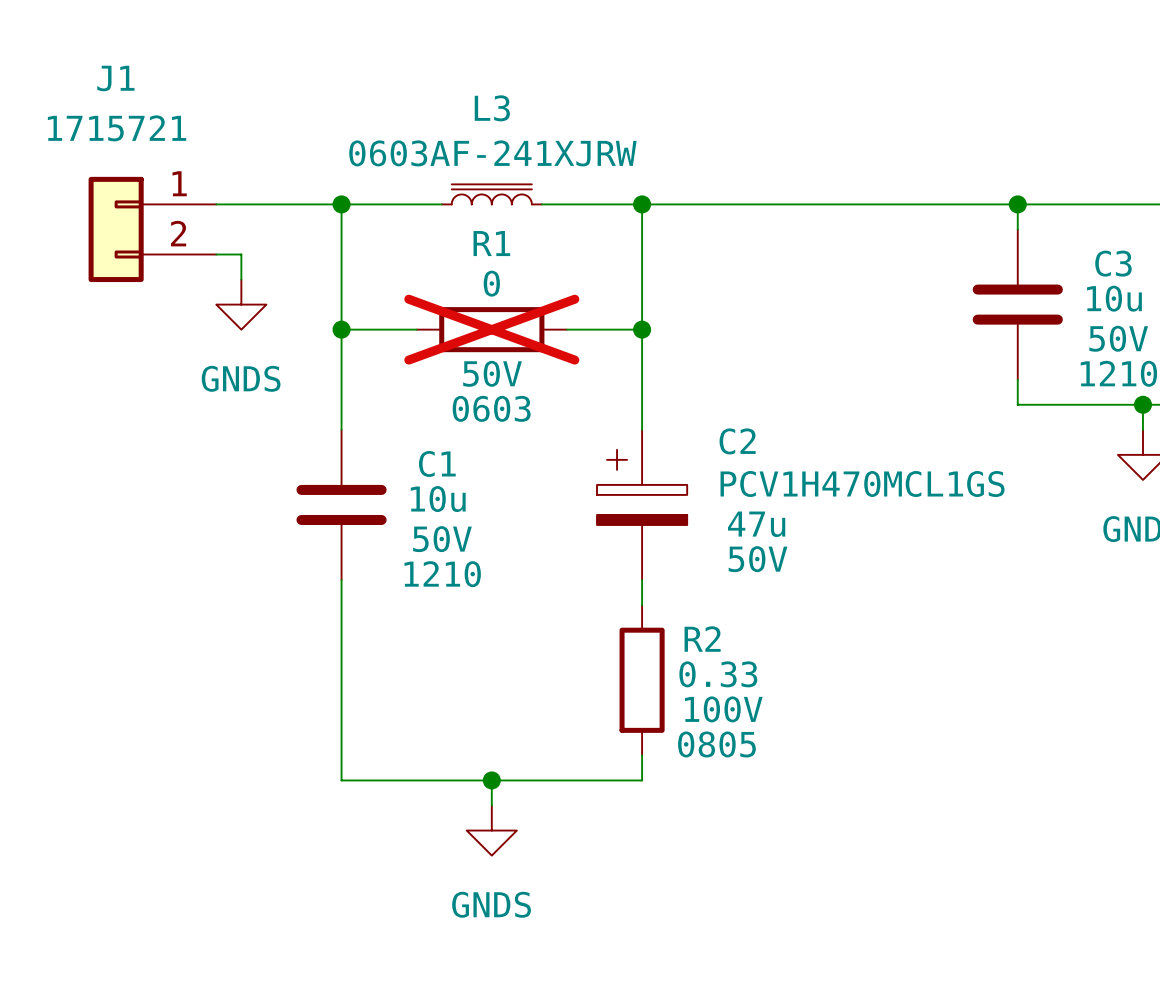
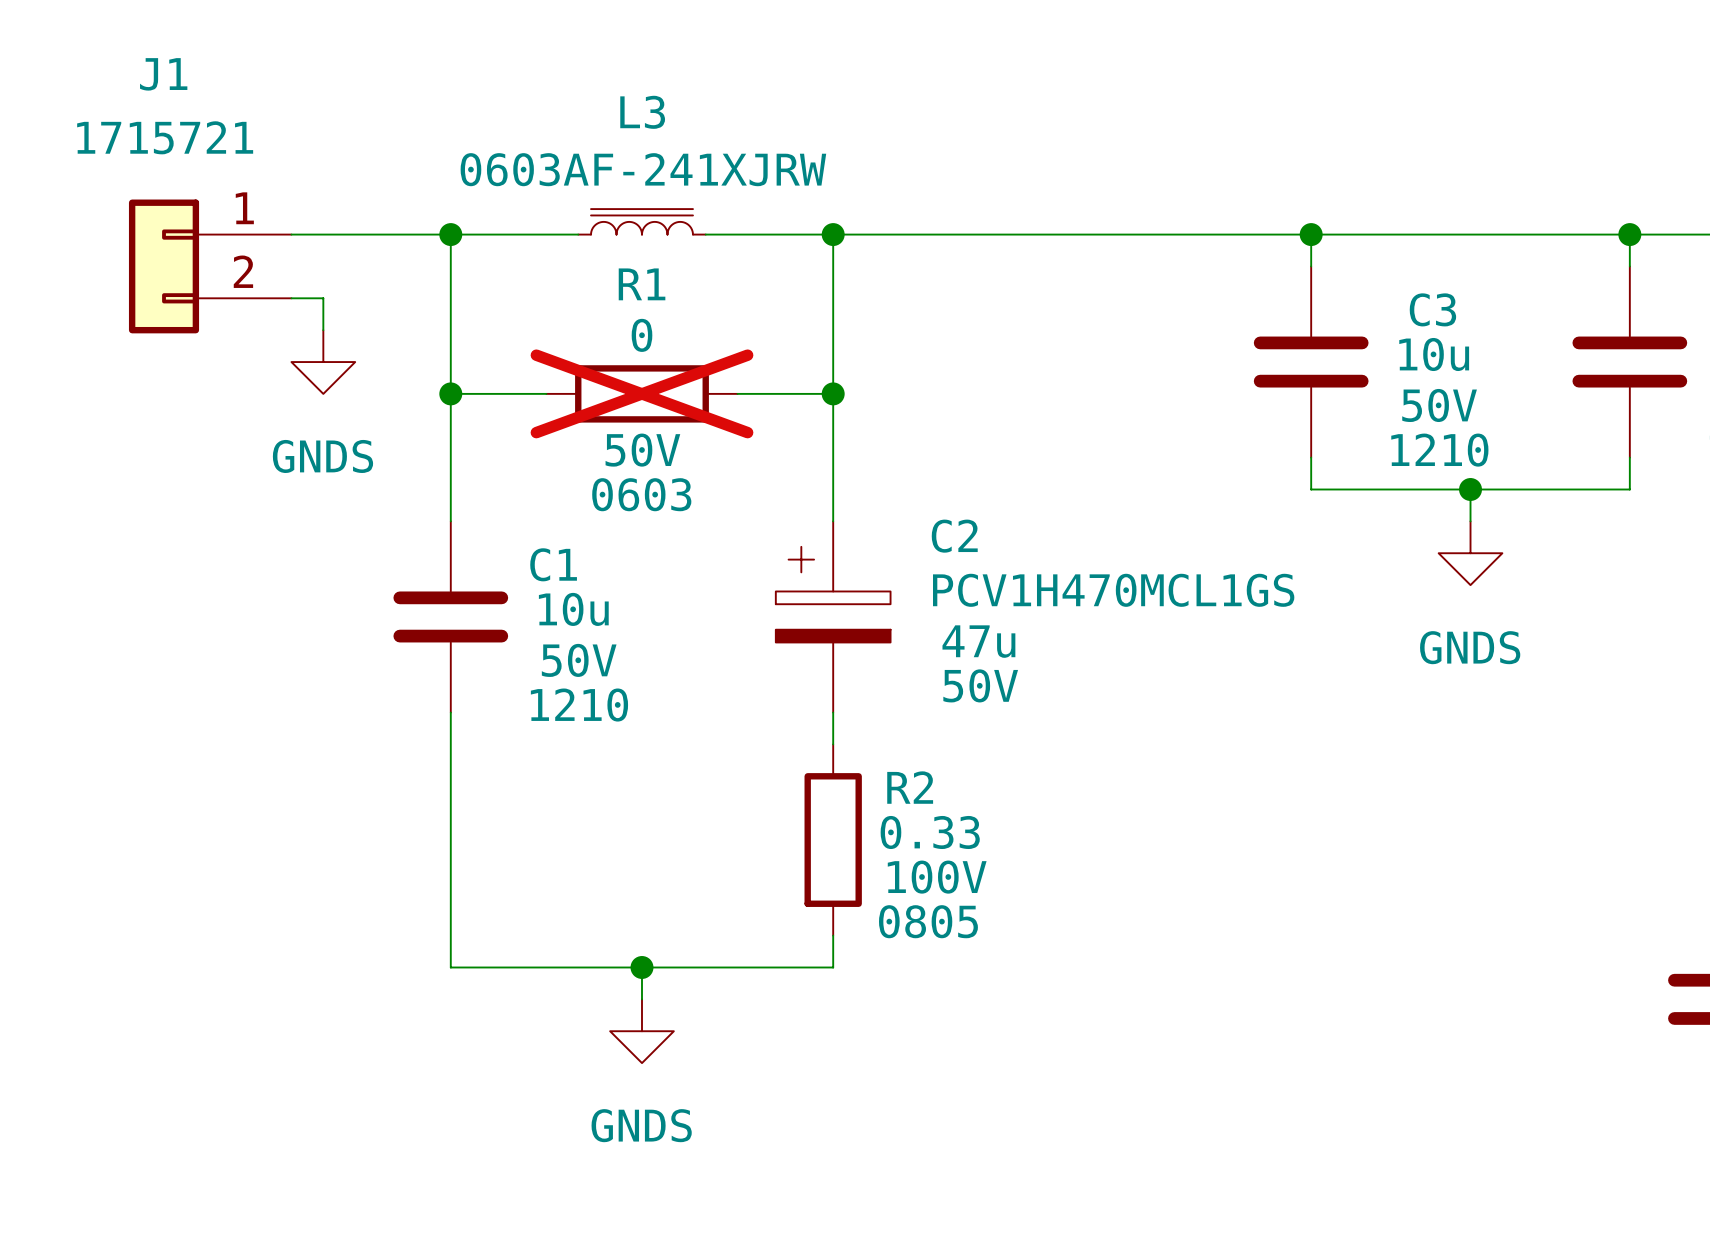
C1 name position: C1 (437, 463) -> C1 (553, 564)

